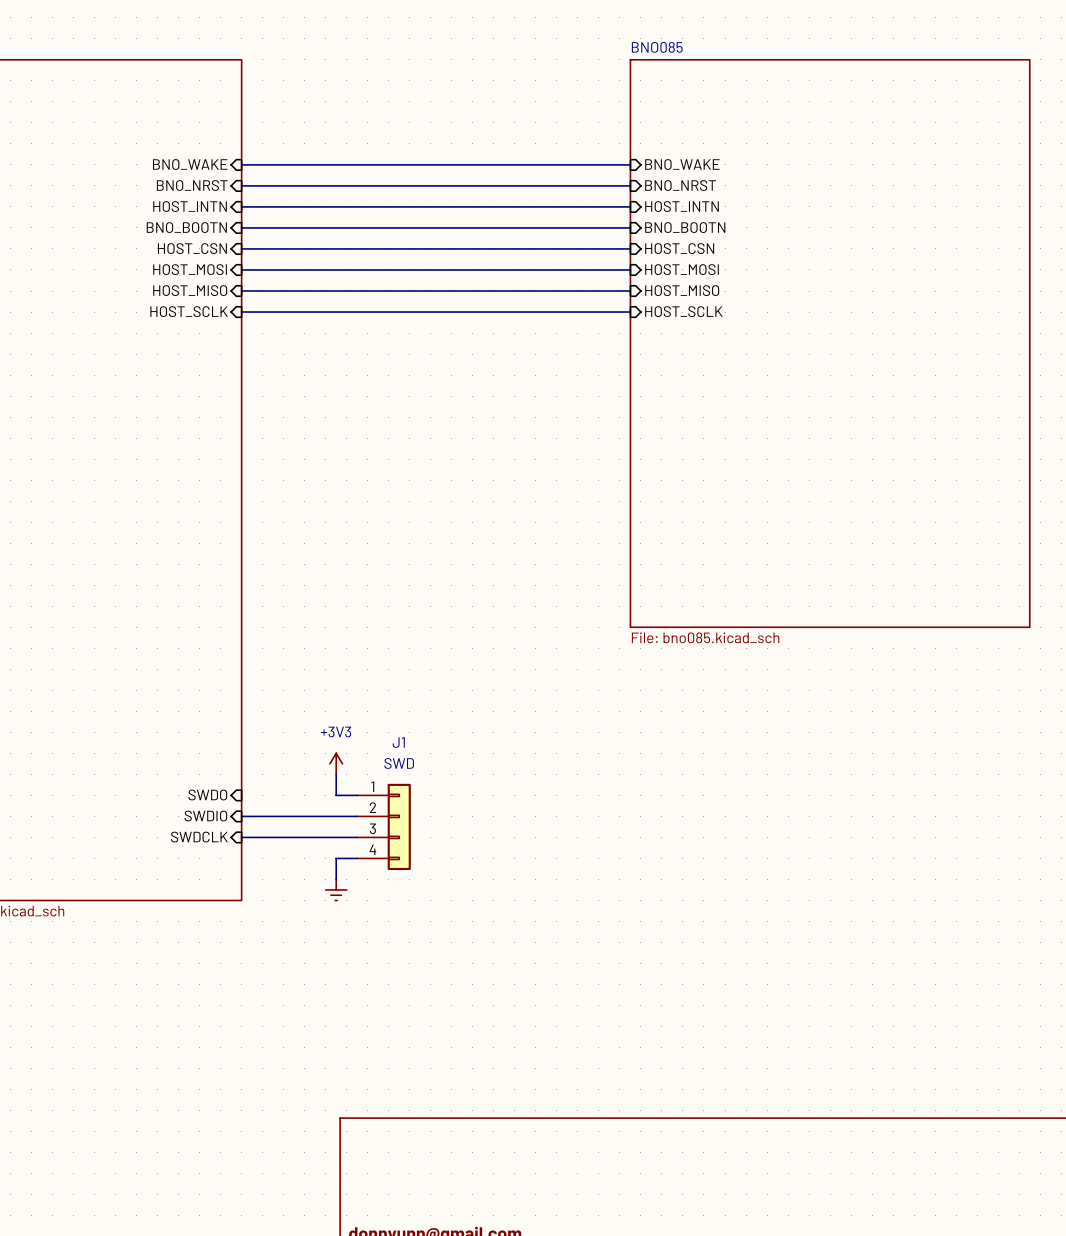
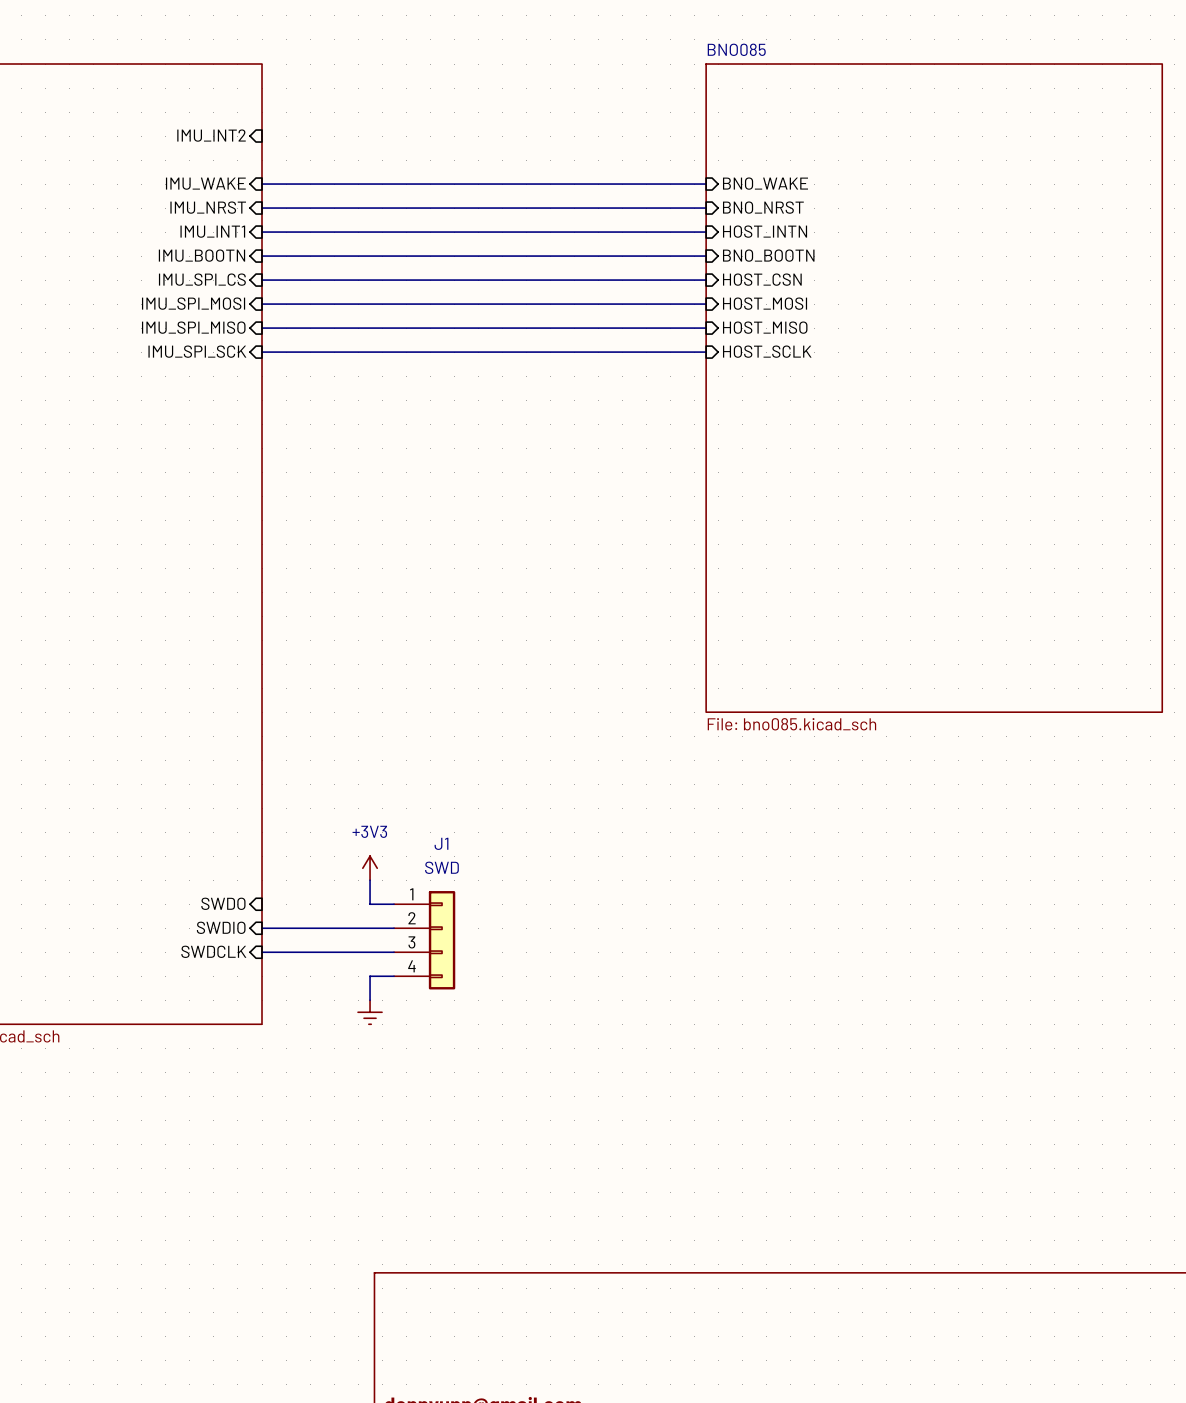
sheet pin: none -> IMU_INT2 (211, 135)
sheet pin: BNO_WAKE (190, 164) -> IMU_WAKE (205, 183)
sheet pin: BNO_NRST (192, 185) -> IMU_NRST (208, 207)
sheet pin: HOST_INTN (190, 206) -> IMU_INT1 (212, 231)
sheet pin: BNO_BOOTN (186, 227) -> IMU_BOOTN (201, 255)
sheet pin: HOST_CSN (192, 248) -> IMU_SPI_CS (202, 279)
sheet pin: HOST_MOSI (190, 269) -> IMU_SPI_MOSI (193, 303)
sheet pin: HOST_MISO (190, 290) -> IMU_SPI_MISO (193, 327)
sheet pin: HOST_SCLK (189, 311) -> IMU_SPI_SCK (197, 351)

